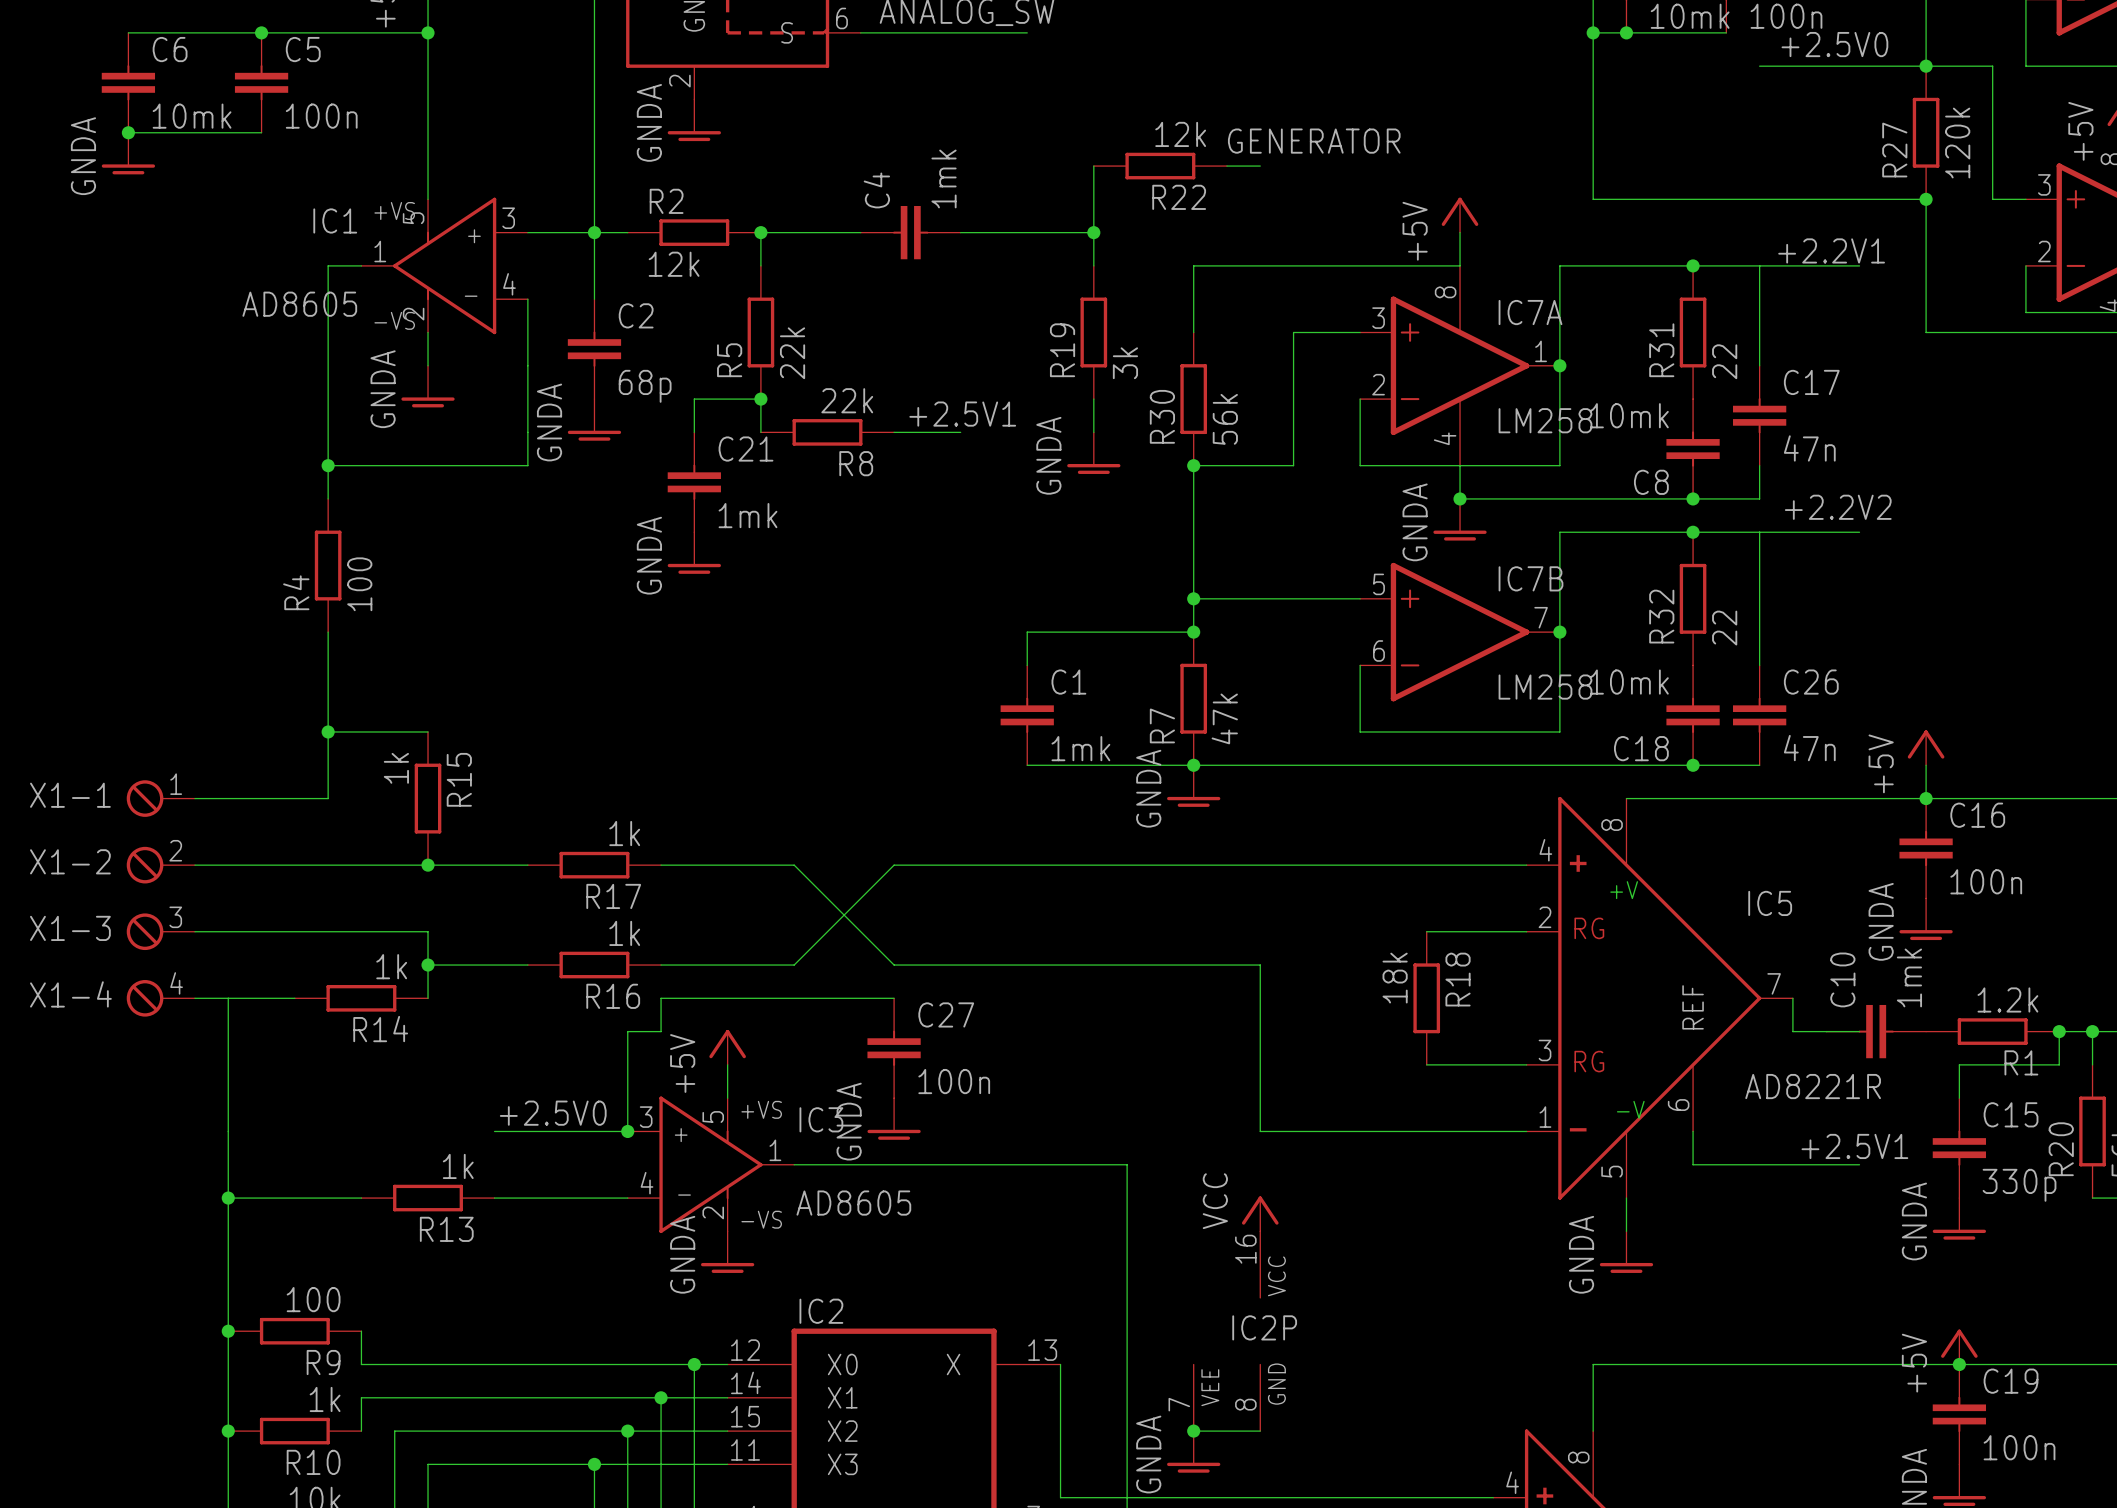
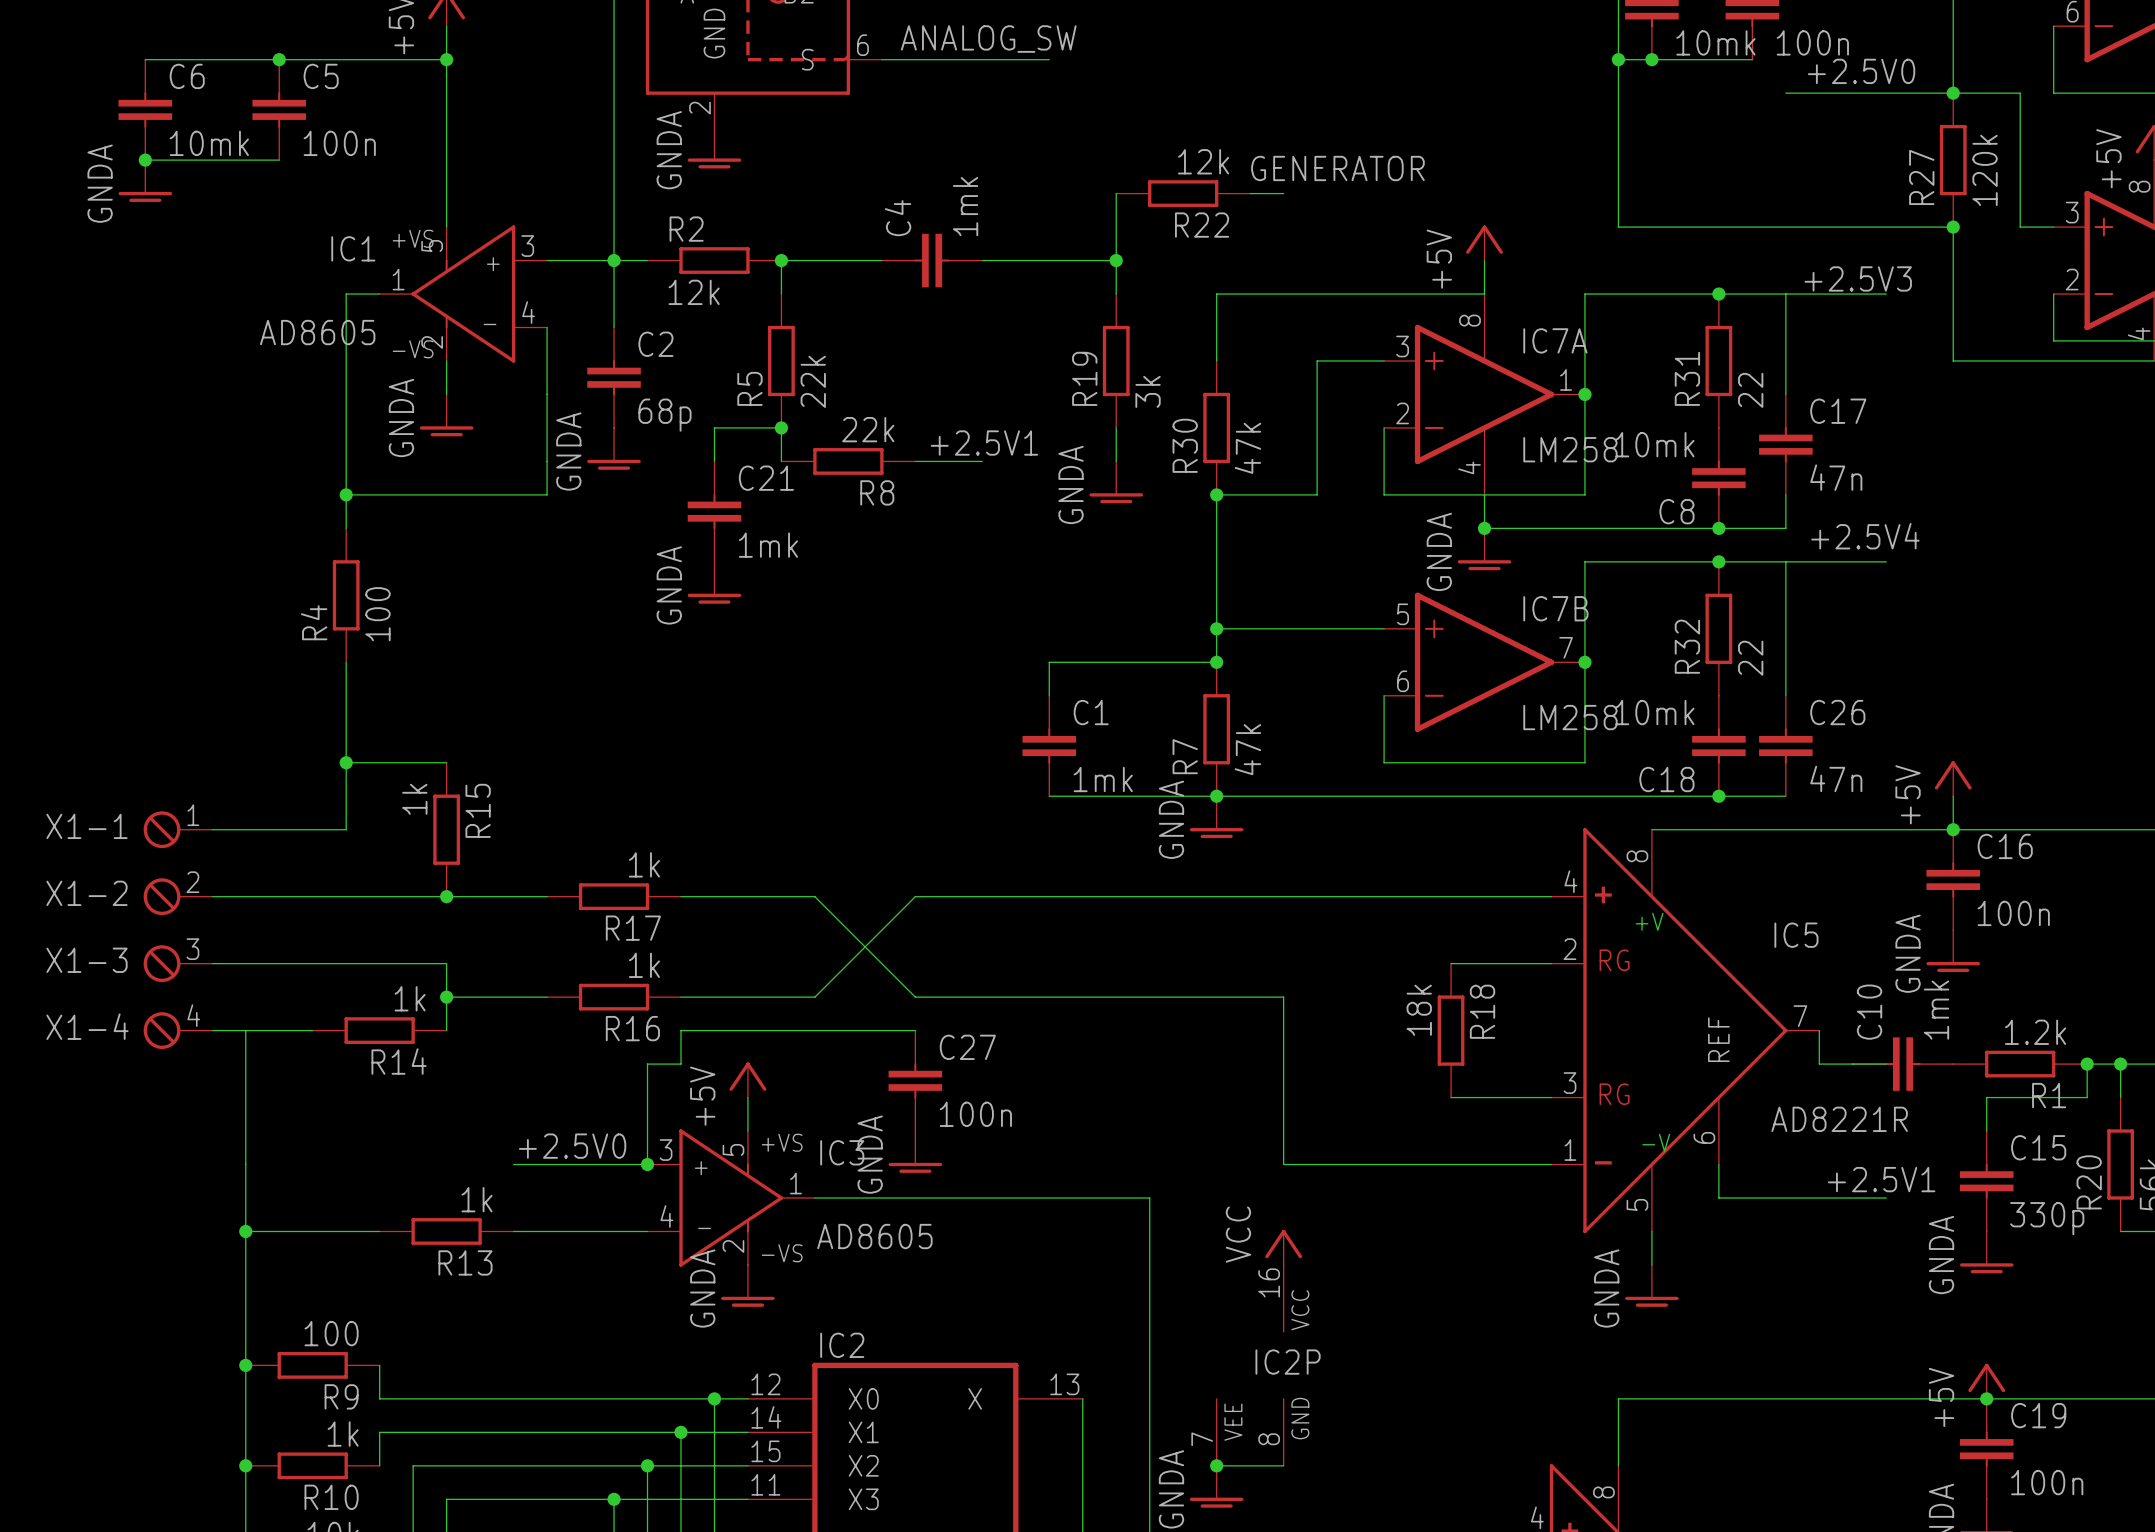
label: +2.2V1 (1831, 250) -> +2.5V3 (1858, 278)
R30 value: 56k (1225, 419) -> 47k (1247, 448)
label: +2.2V2 (1838, 507) -> +2.5V4 (1865, 536)

